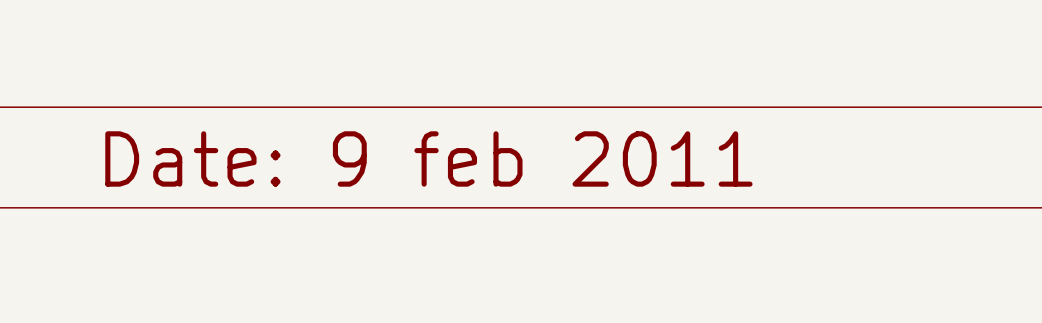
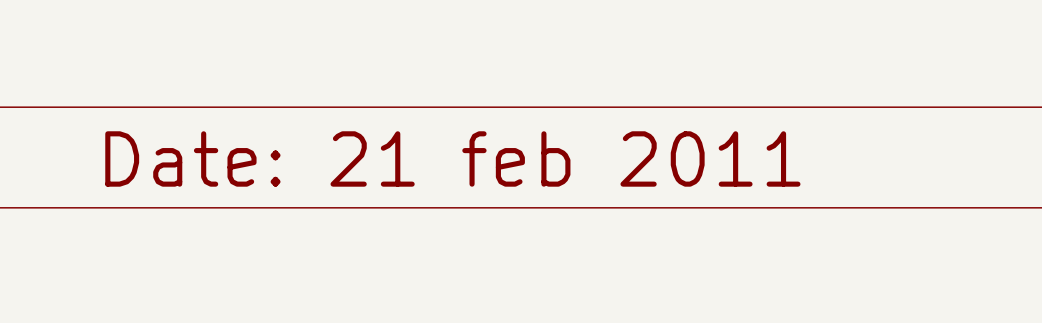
title block: Date: 9 feb 2011 (428, 158) -> Date: 21 feb 2011 (452, 158)

